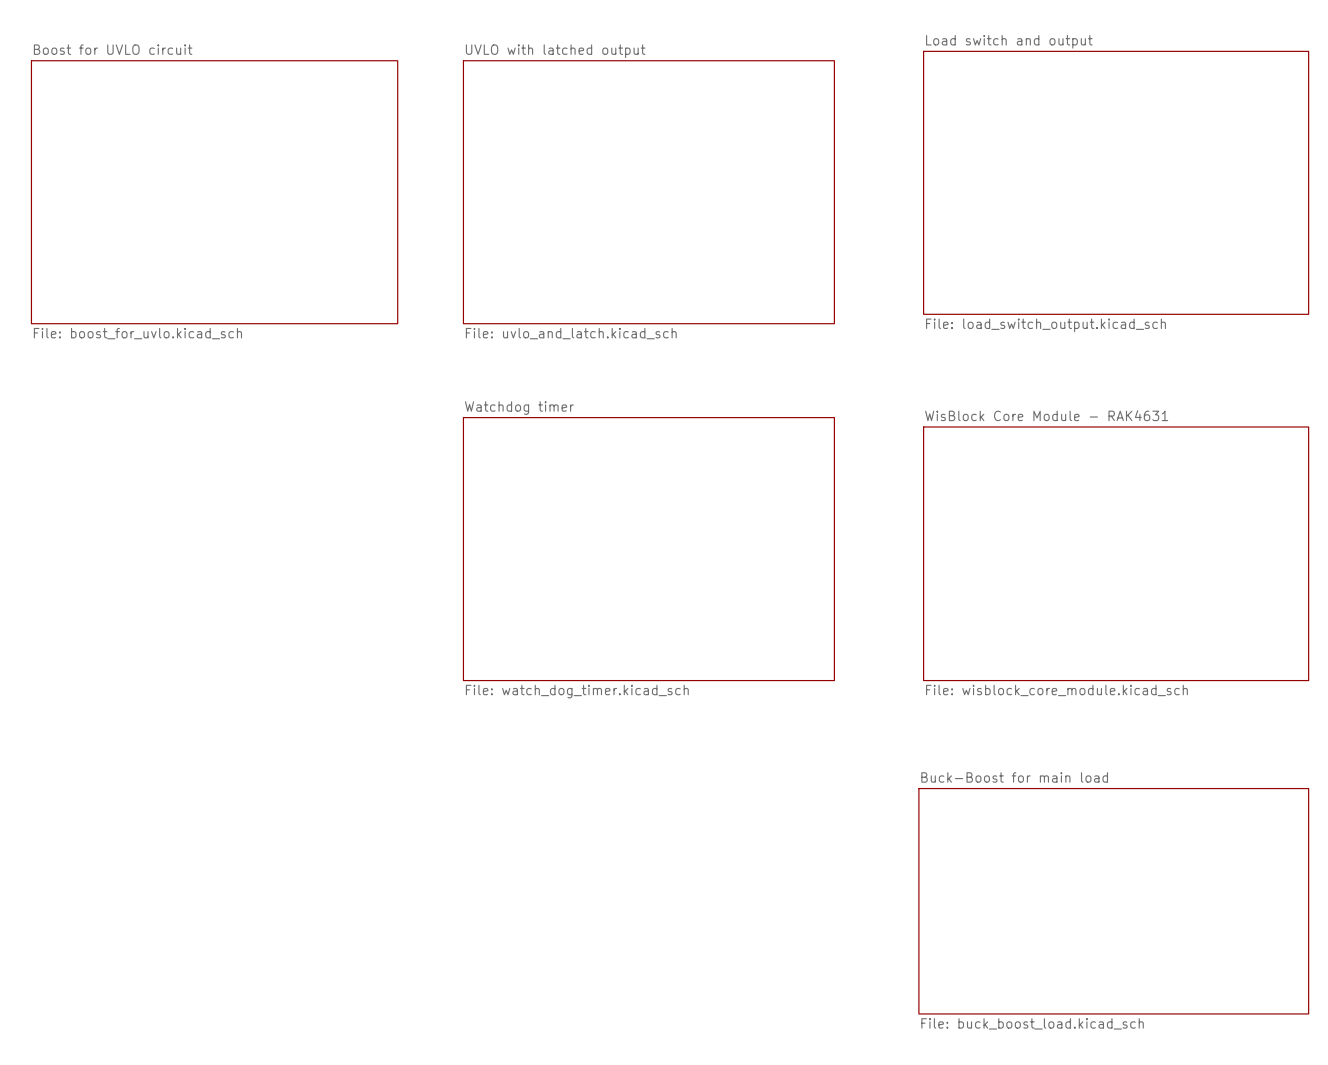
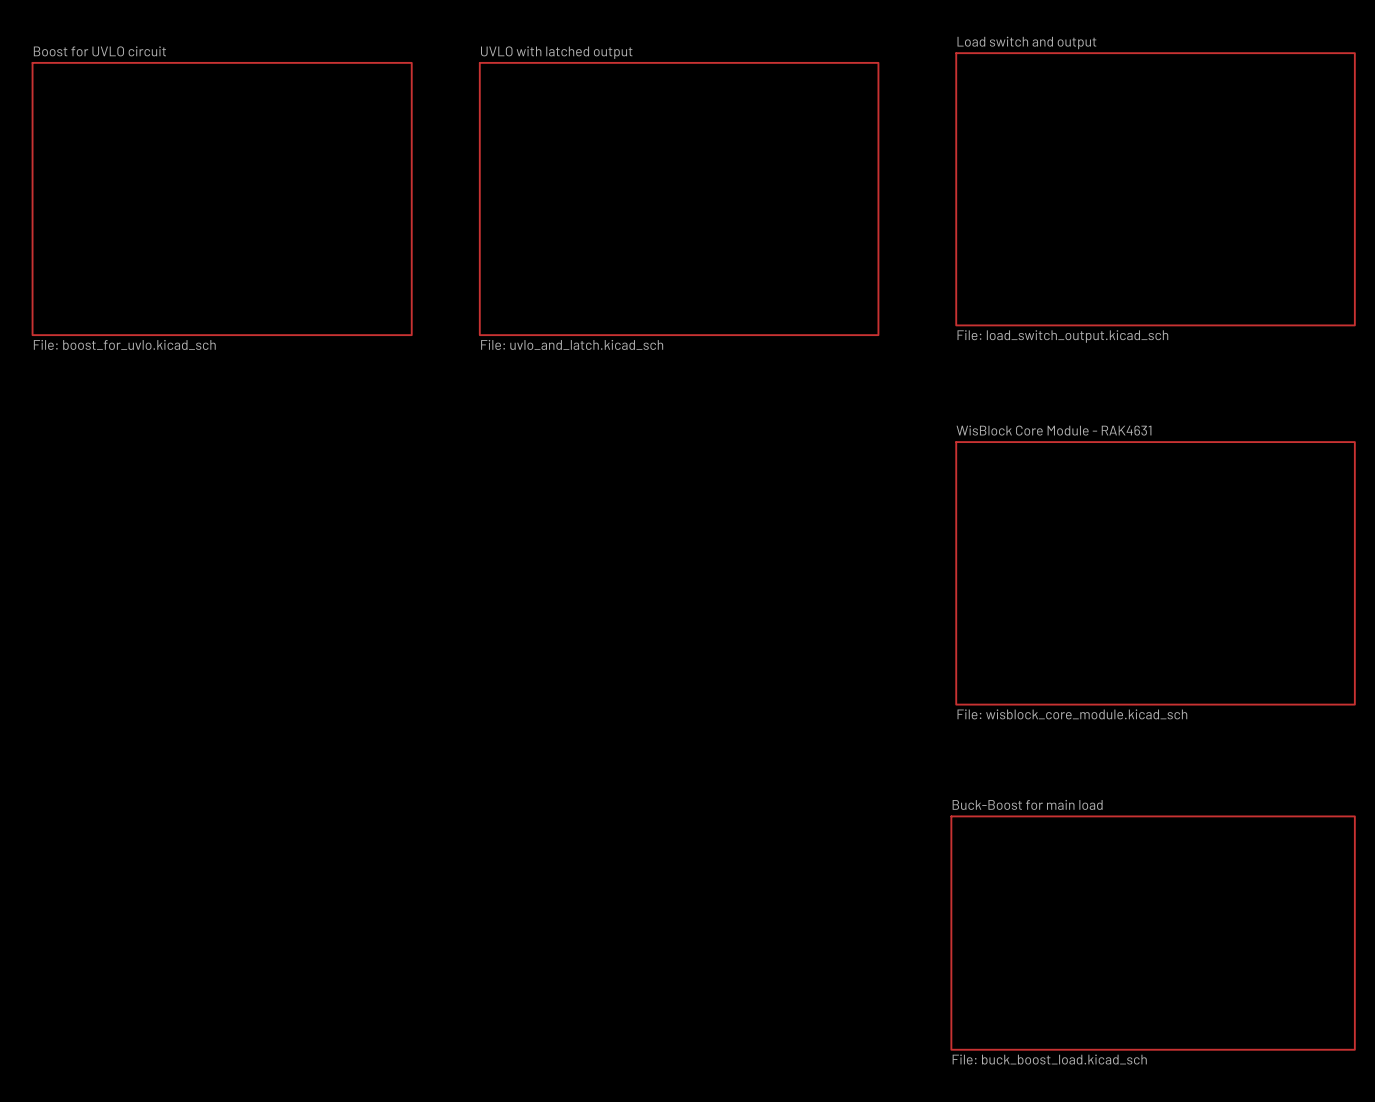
sheet UVLO with latched output shape: [462, 60, 835, 325] -> [479, 62, 880, 336]
sheet Watchdog timer: File: watch_dog_timer.kicad_sch (648, 549) -> none

